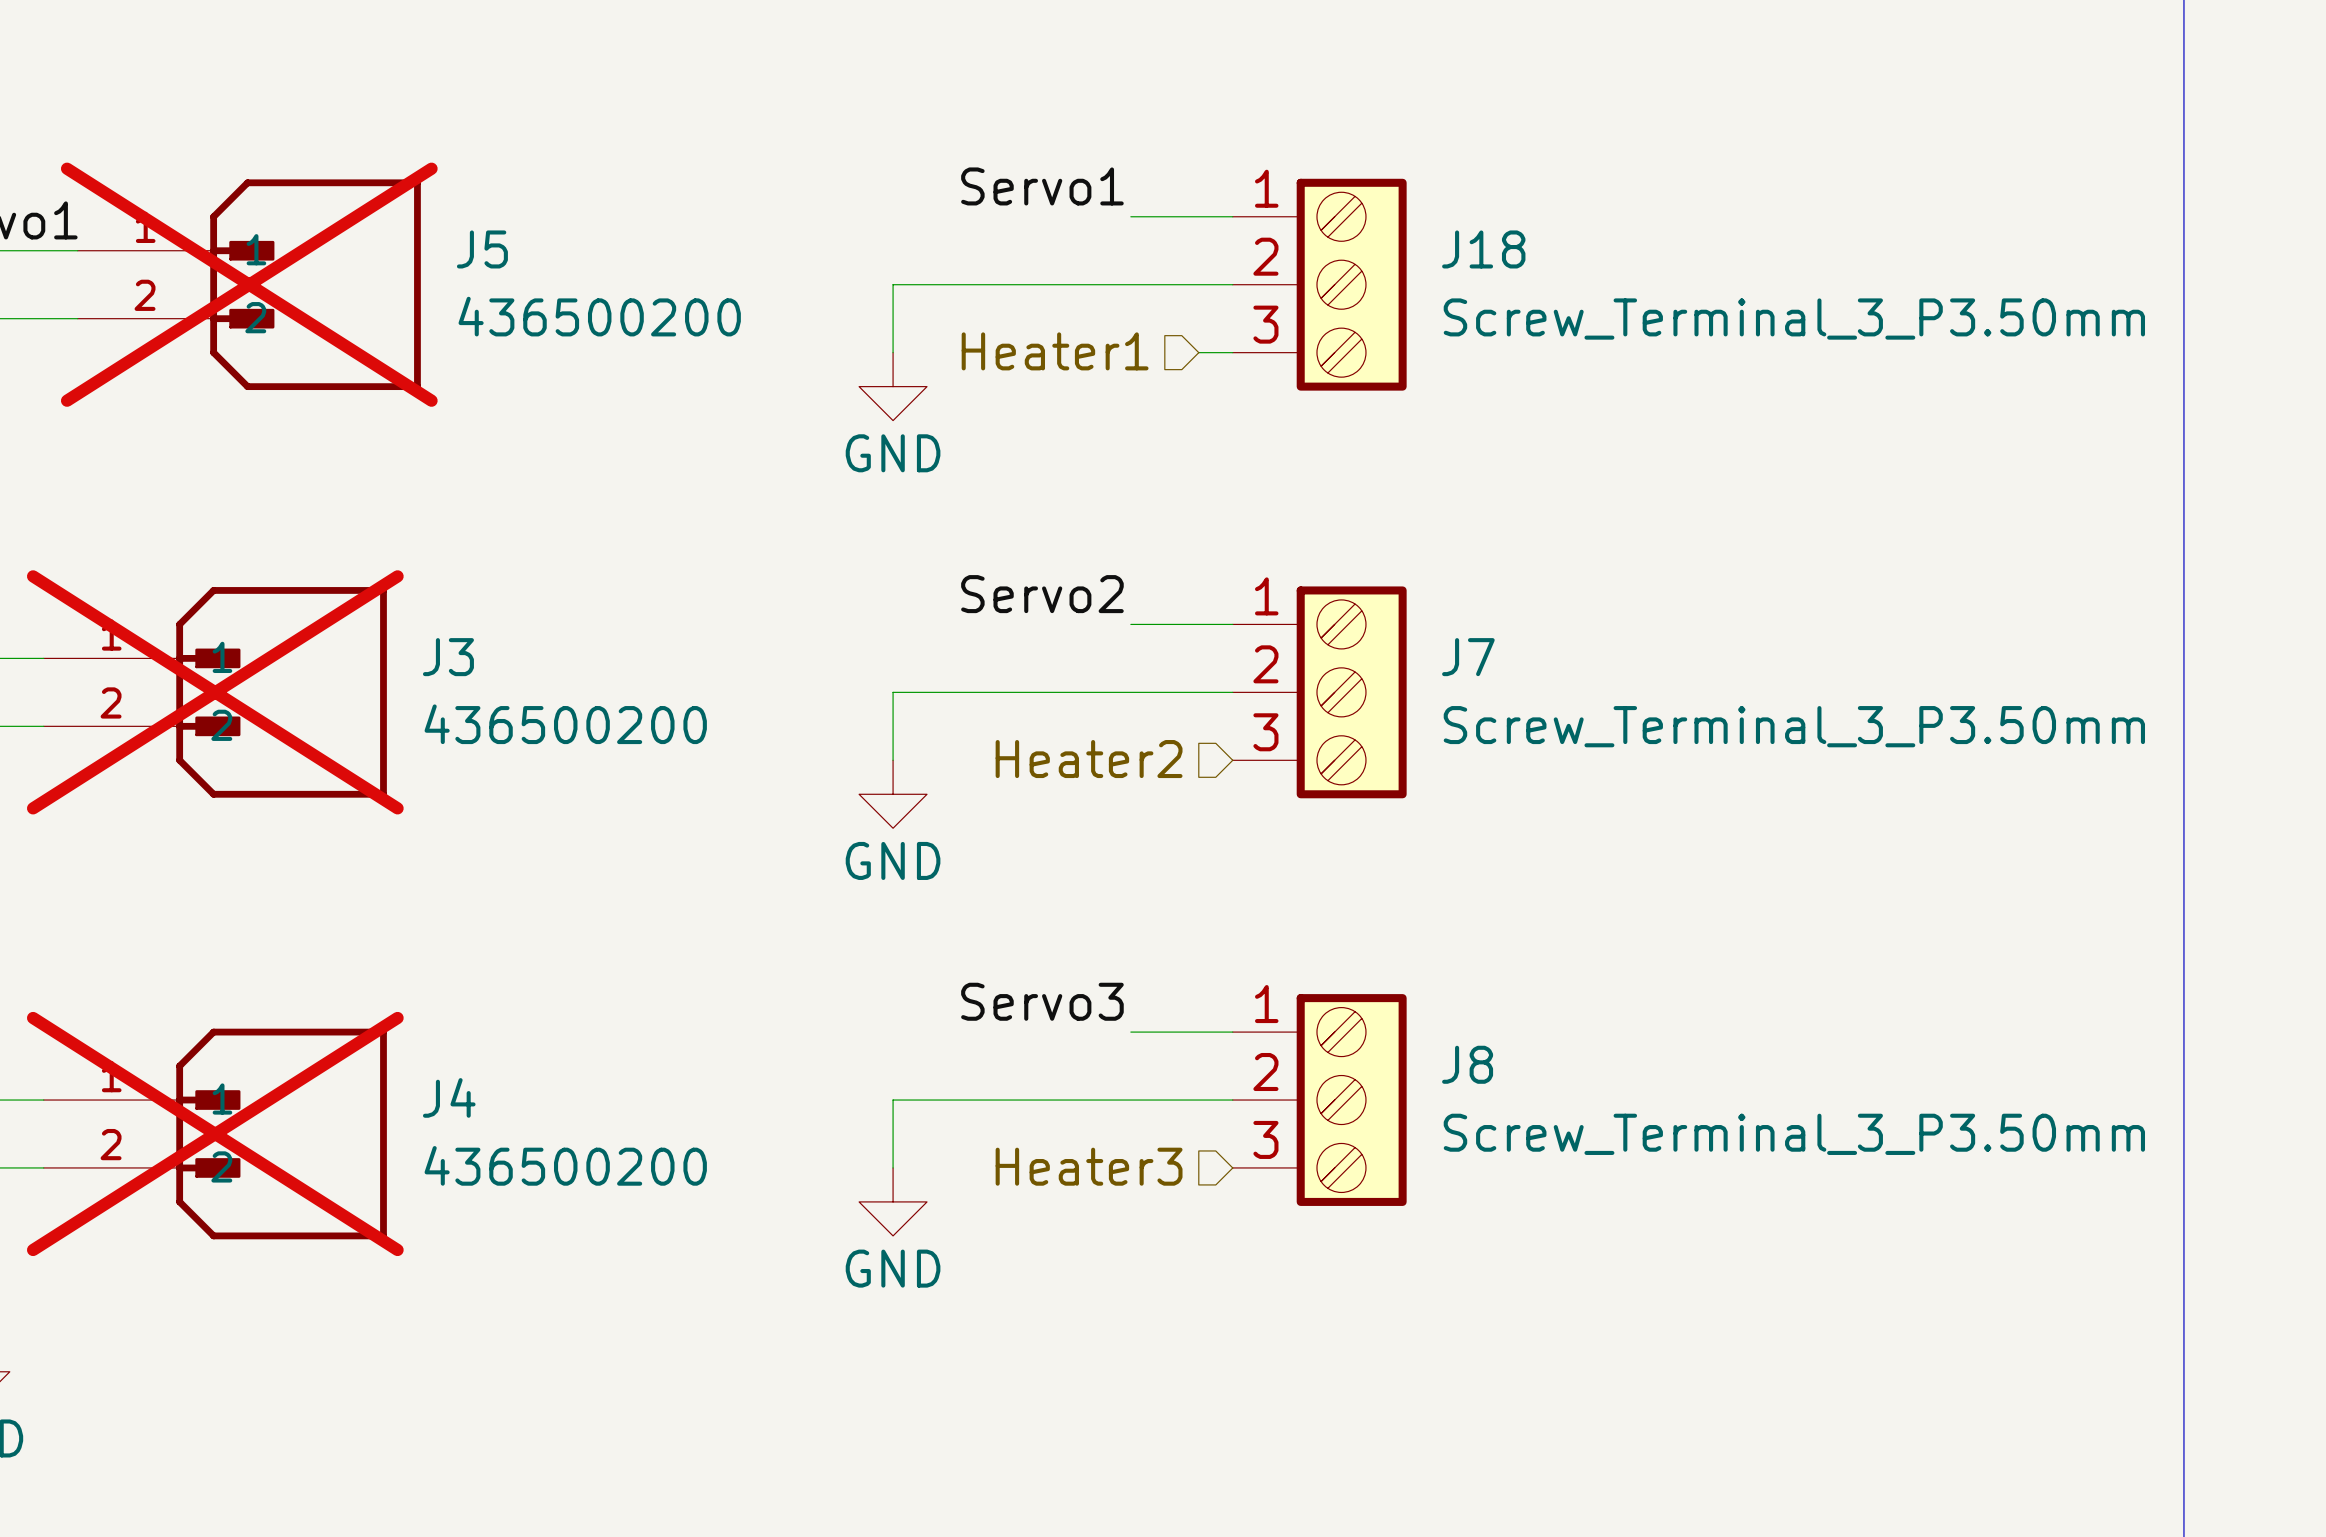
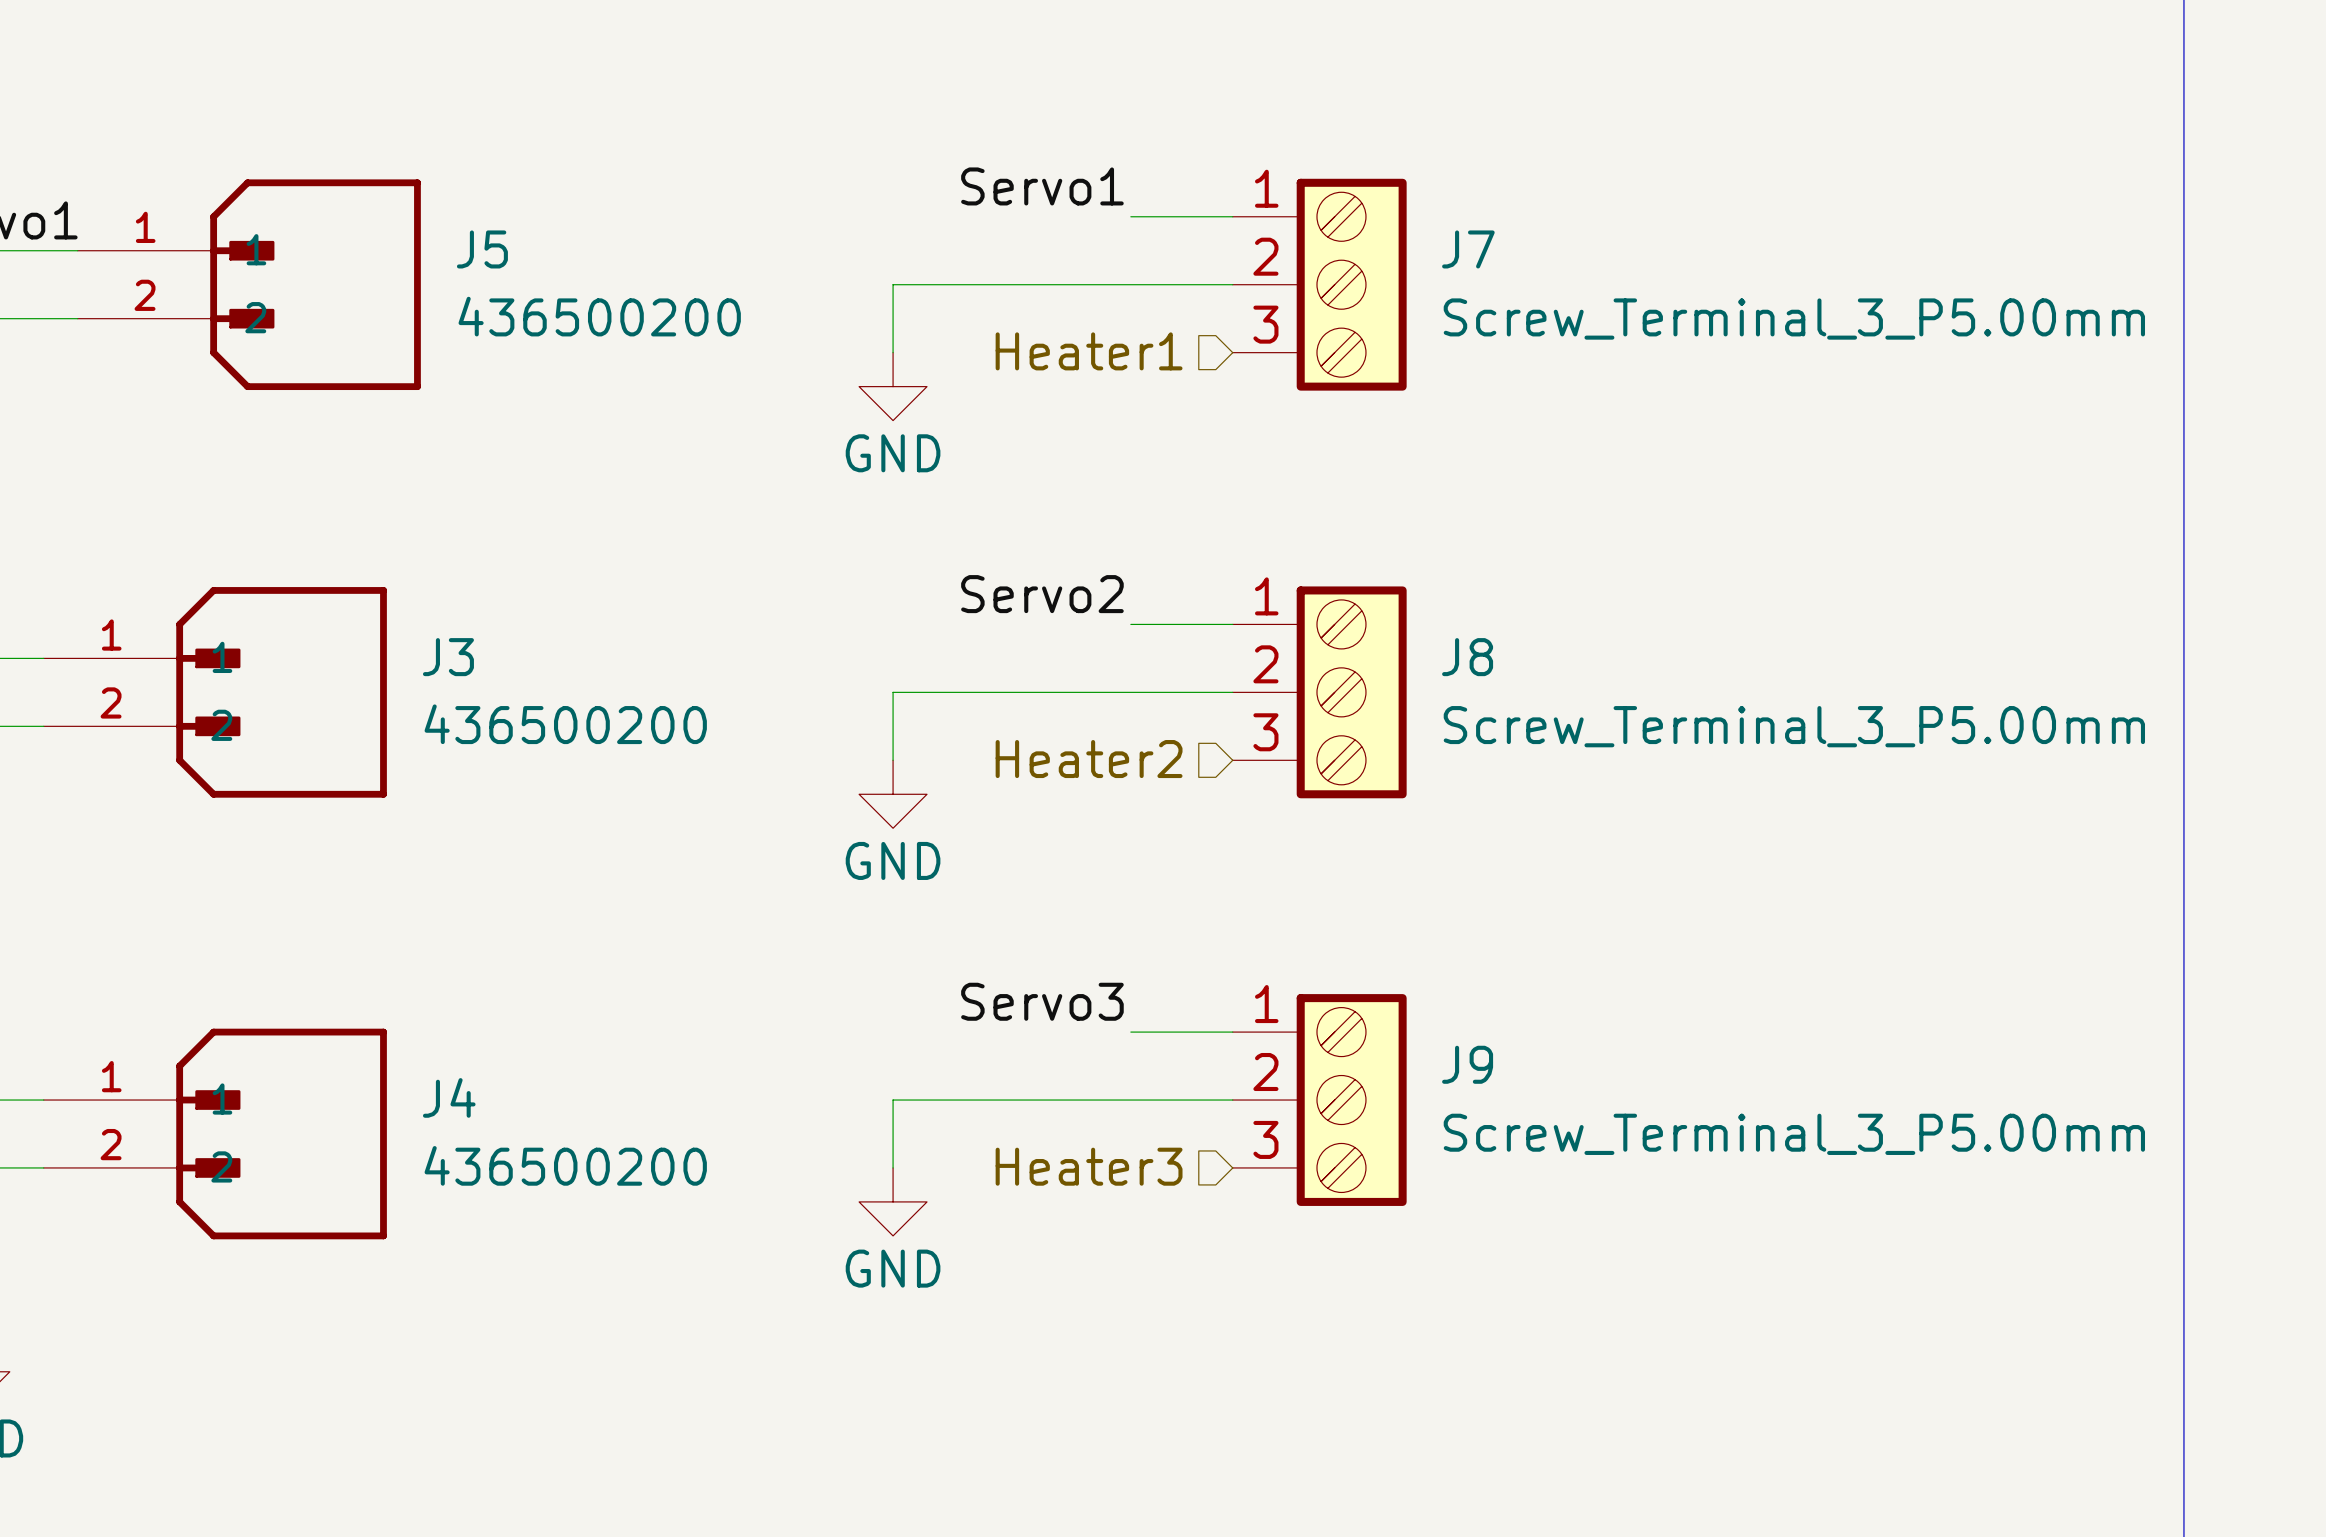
J18 name: J18 (1483, 249) -> J7 (1468, 249)
J5 do-not-place cross: (249, 284) -> none
J18 value: Screw_Terminal_3_P3.50mm (1794, 319) -> Screw_Terminal_3_P5.00mm (1794, 319)
hierarchical label position: Heater1 (1055, 351) -> Heater1 (1089, 351)
wire: (1198, 352) (1232, 352) -> none
J7 name: J7 (1468, 657) -> J8 (1467, 657)
J3 do-not-place cross: (215, 692) -> none
J7 value: Screw_Terminal_3_P3.50mm (1794, 726) -> Screw_Terminal_3_P5.00mm (1794, 726)
J8 name: J8 (1467, 1064) -> J9 (1467, 1064)
J4 do-not-place cross: (215, 1133) -> none
J8 value: Screw_Terminal_3_P3.50mm (1794, 1134) -> Screw_Terminal_3_P5.00mm (1794, 1134)

